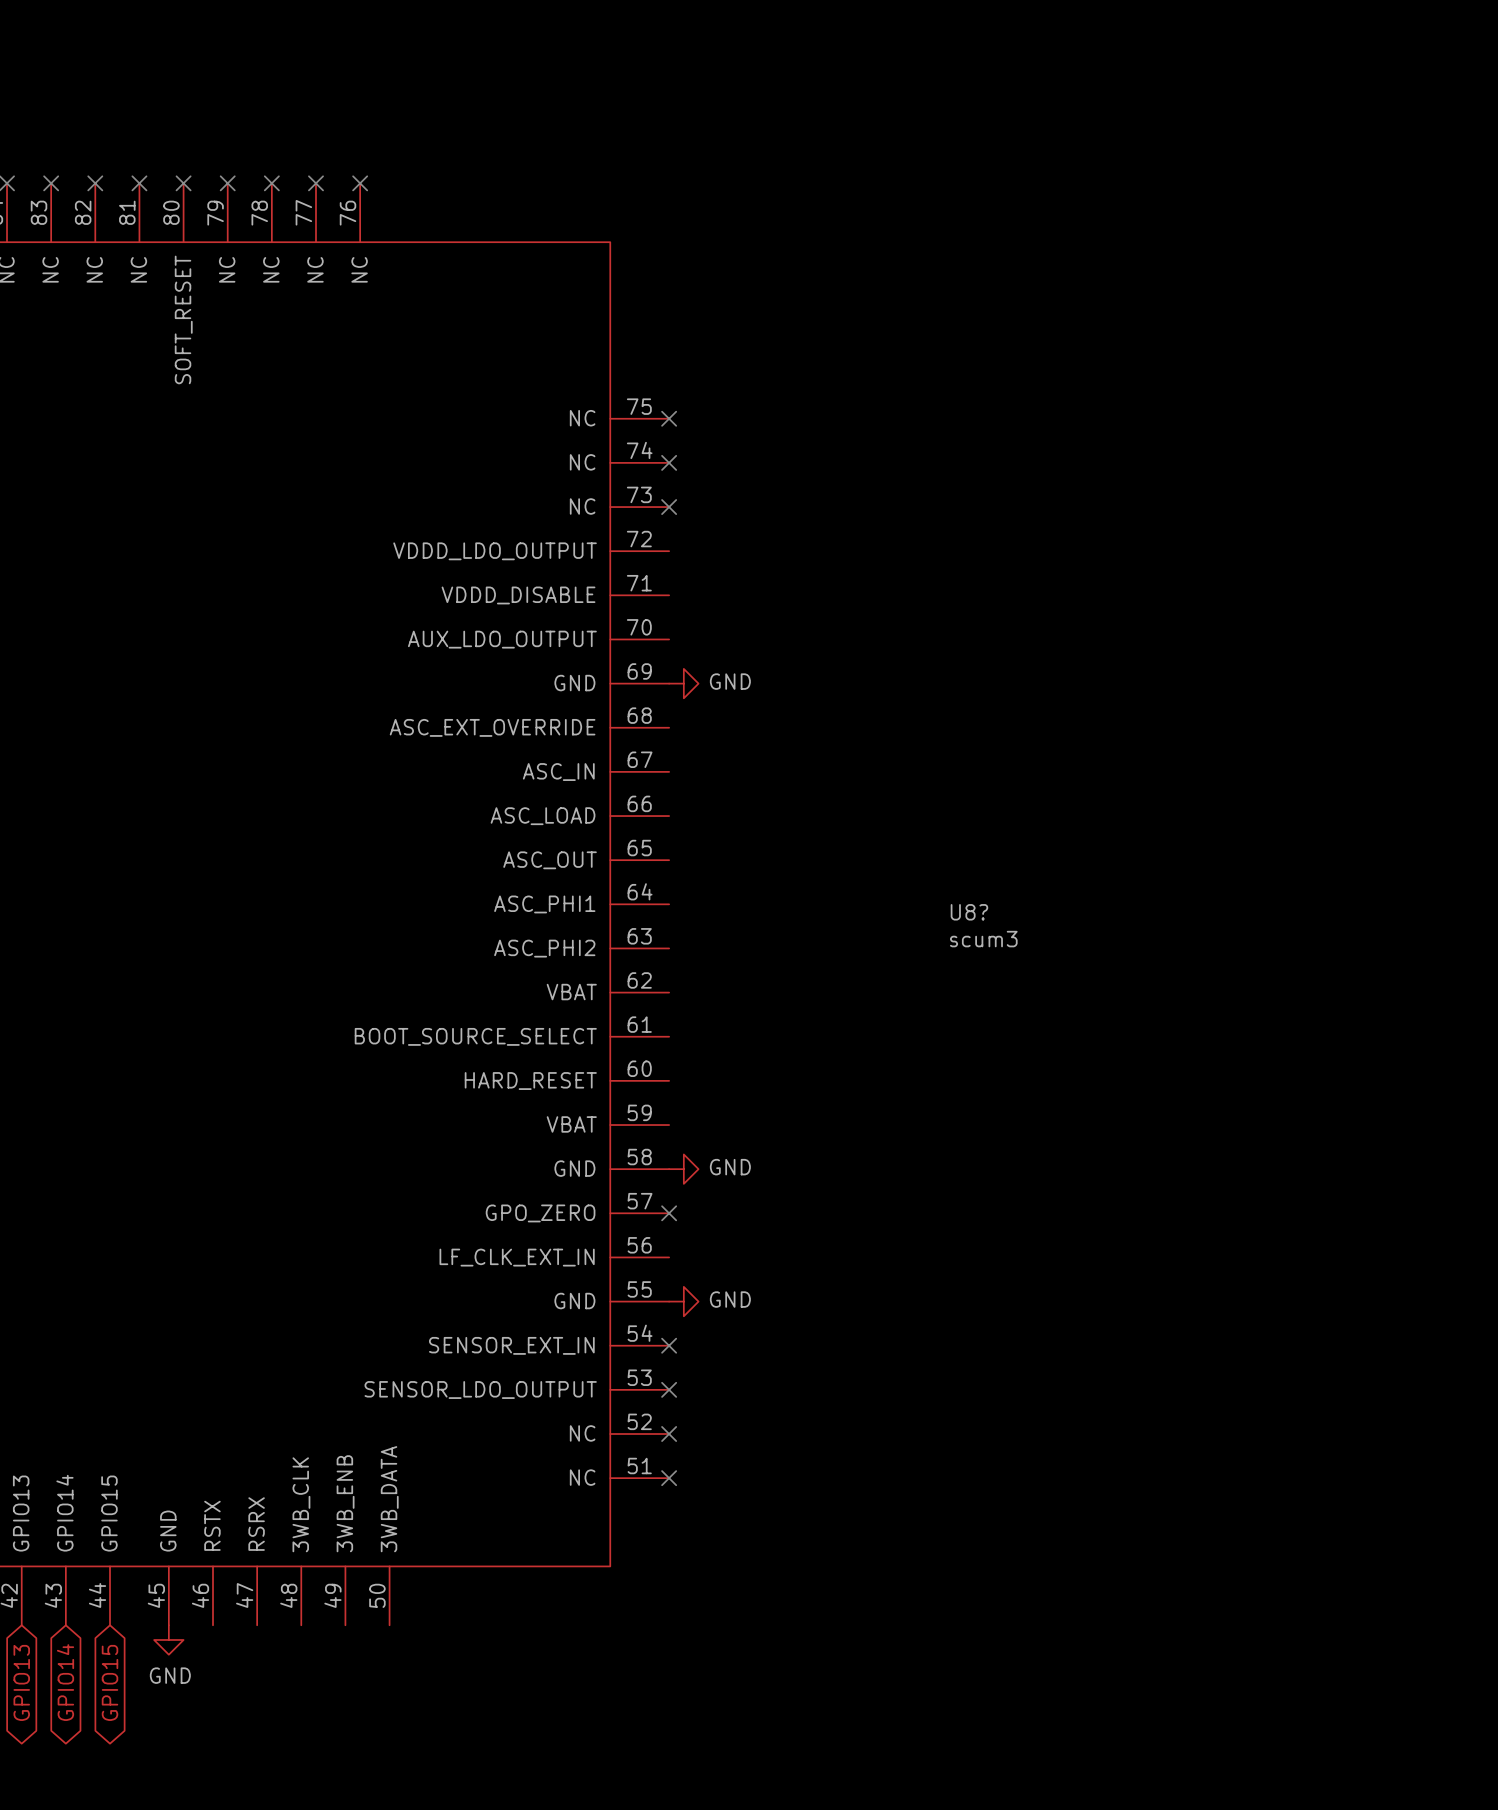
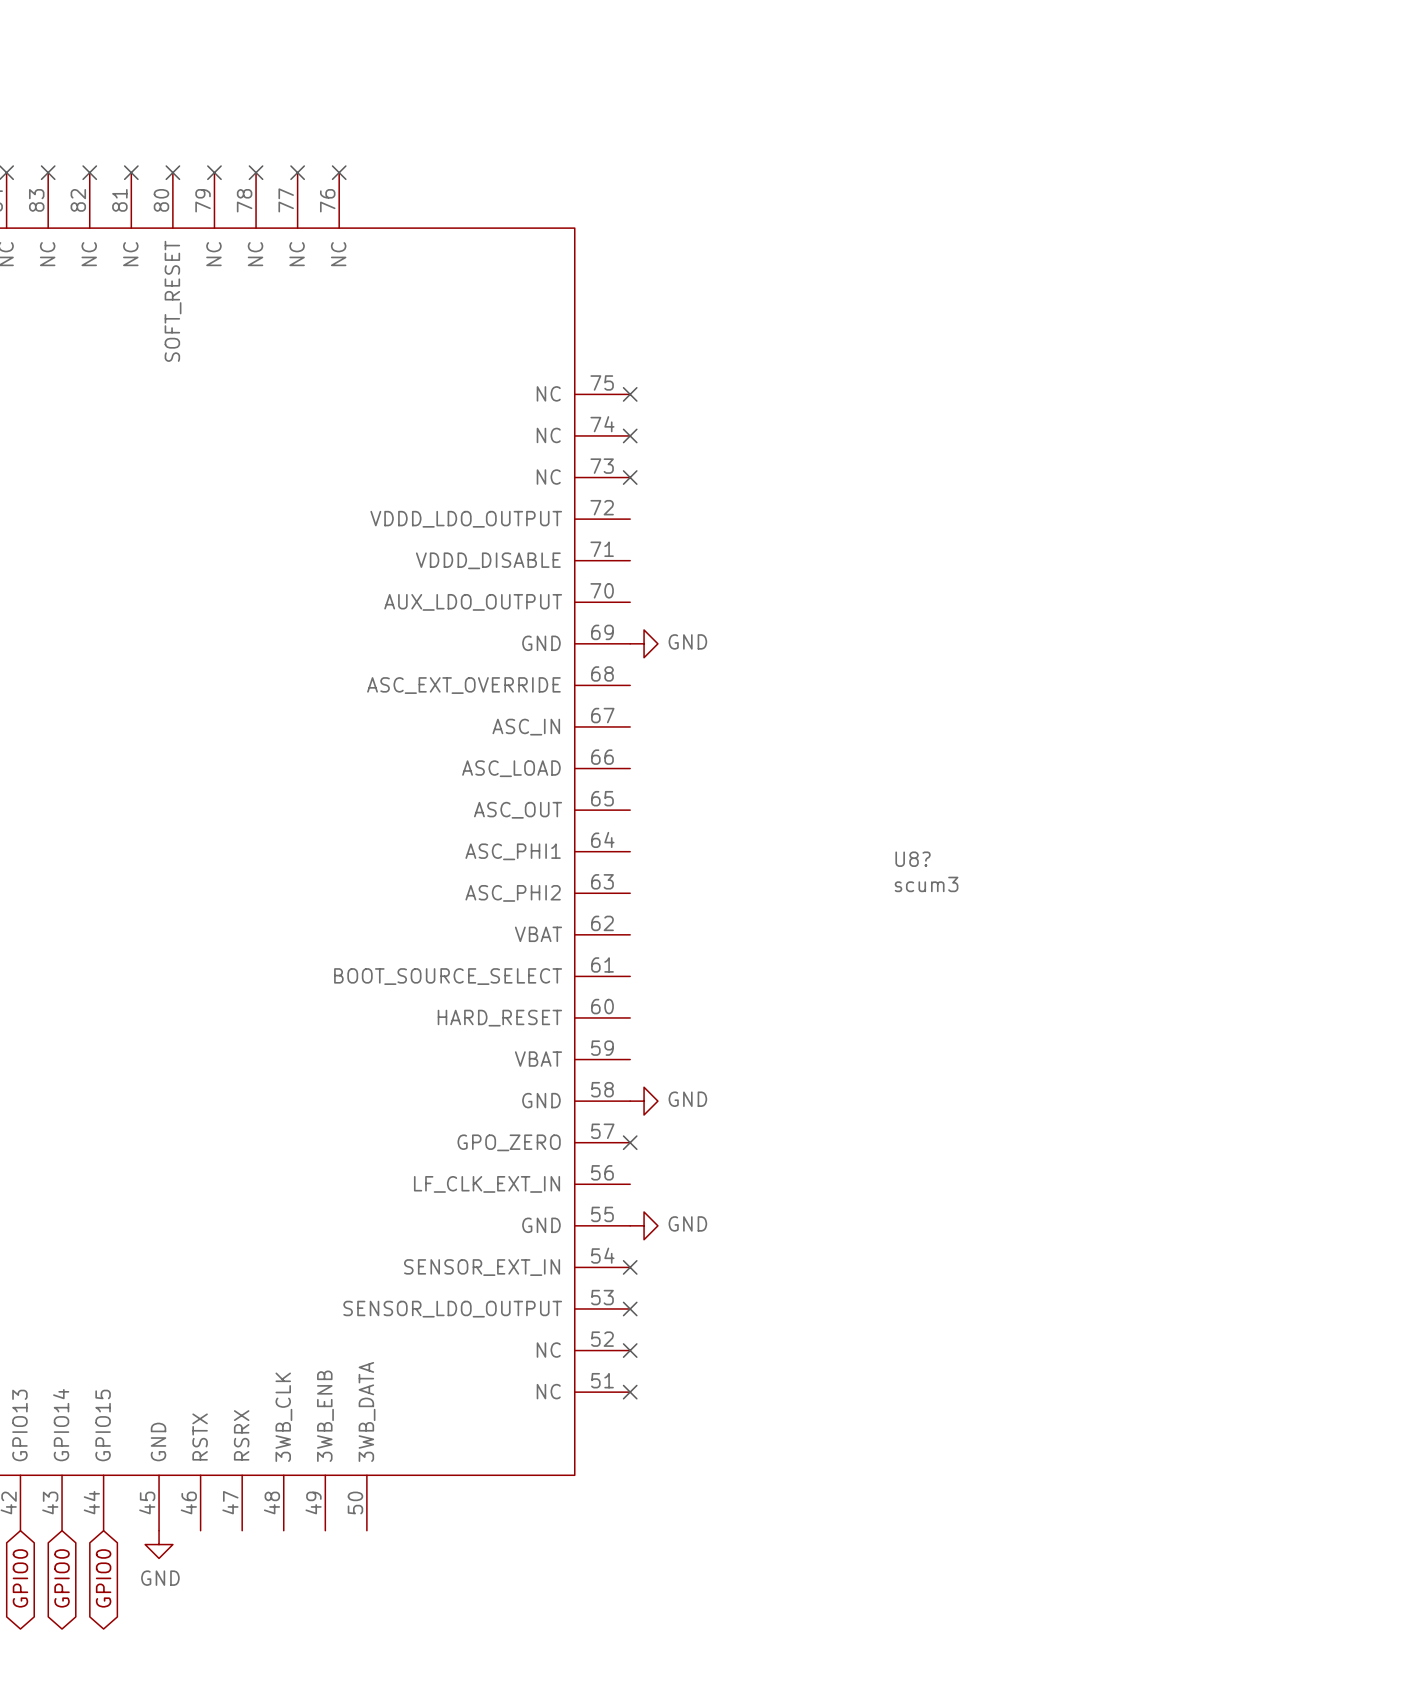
global label: GPIO13 (21, 1682) -> GPIO0 (20, 1578)
global label: GPIO14 (65, 1682) -> GPIO0 (62, 1578)
global label: GPIO15 (110, 1682) -> GPIO0 (103, 1578)

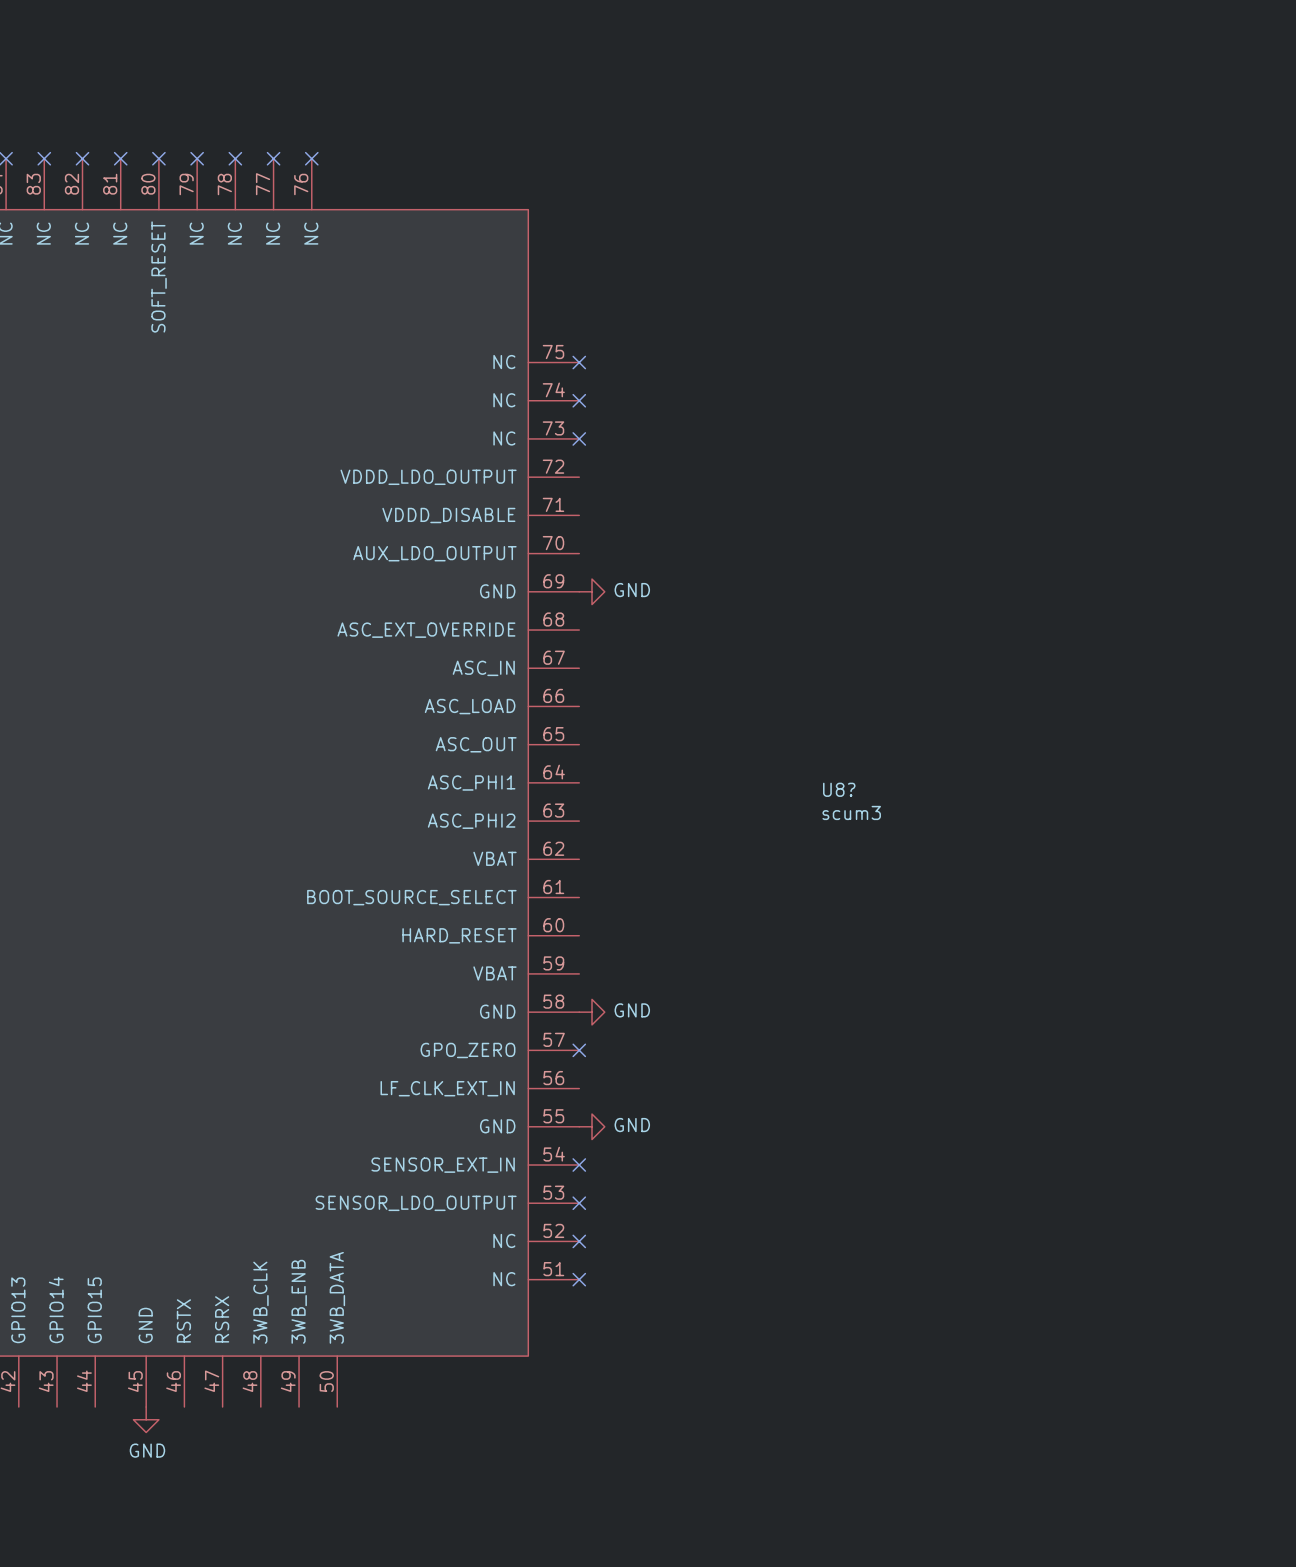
global label: GPIO0 (20, 1578) -> none
global label: GPIO0 (62, 1578) -> none
global label: GPIO0 (103, 1578) -> none

